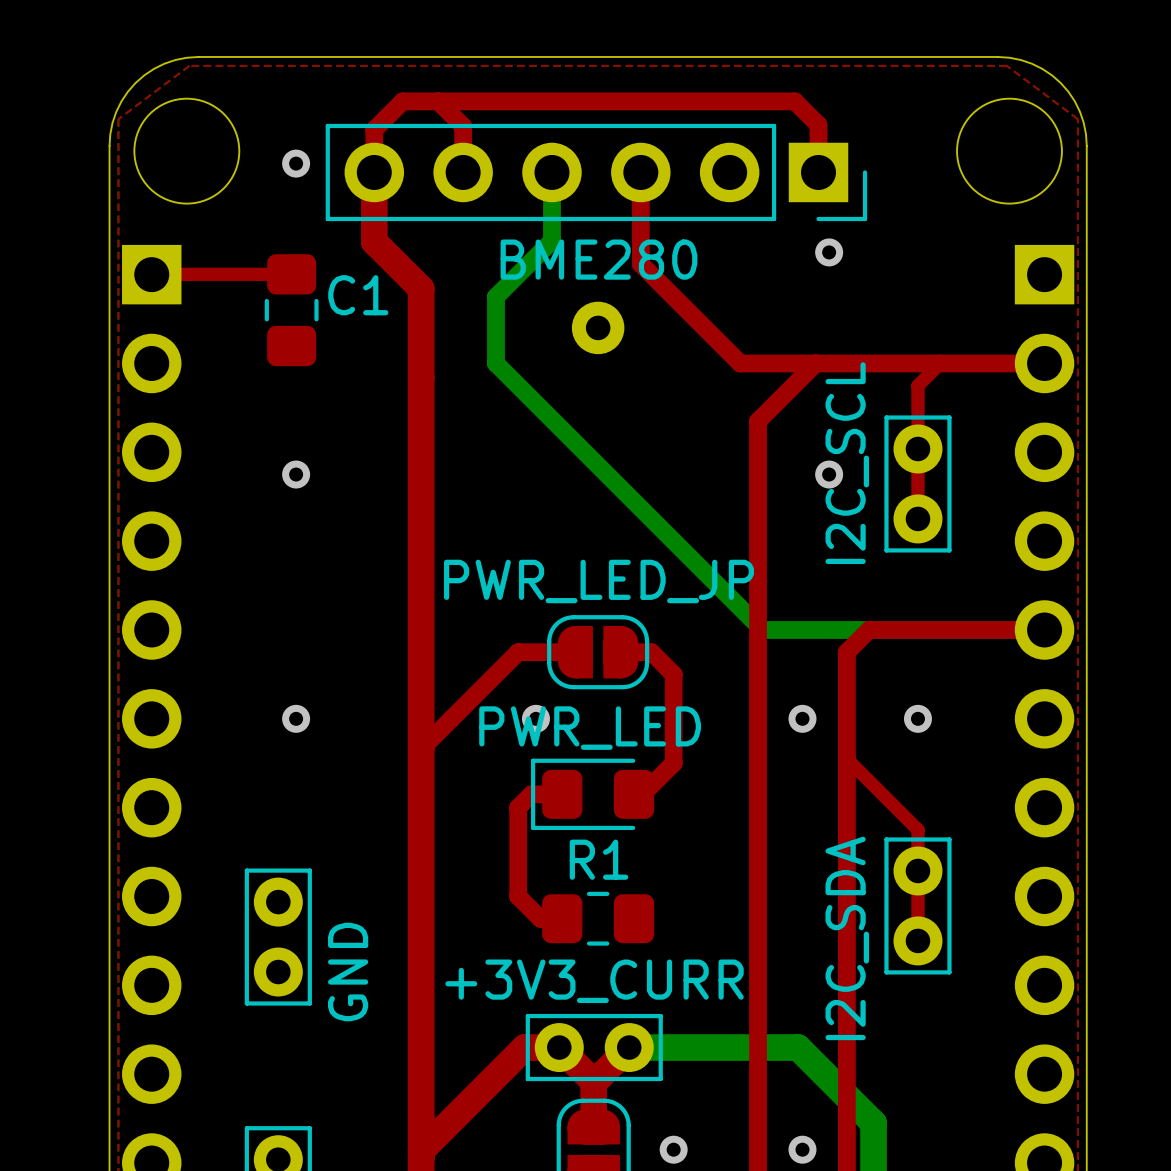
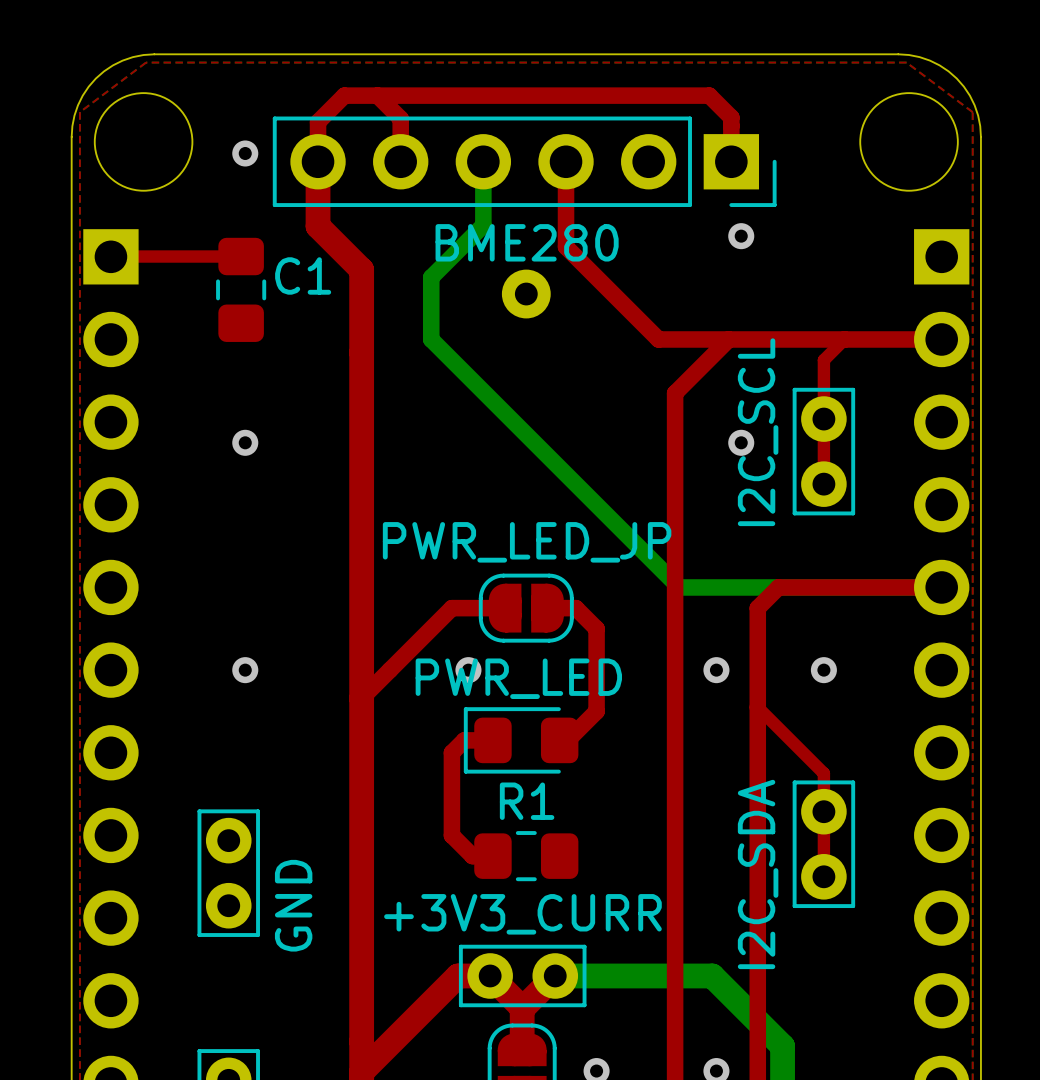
part position: (598, 327) -> (526, 294)

